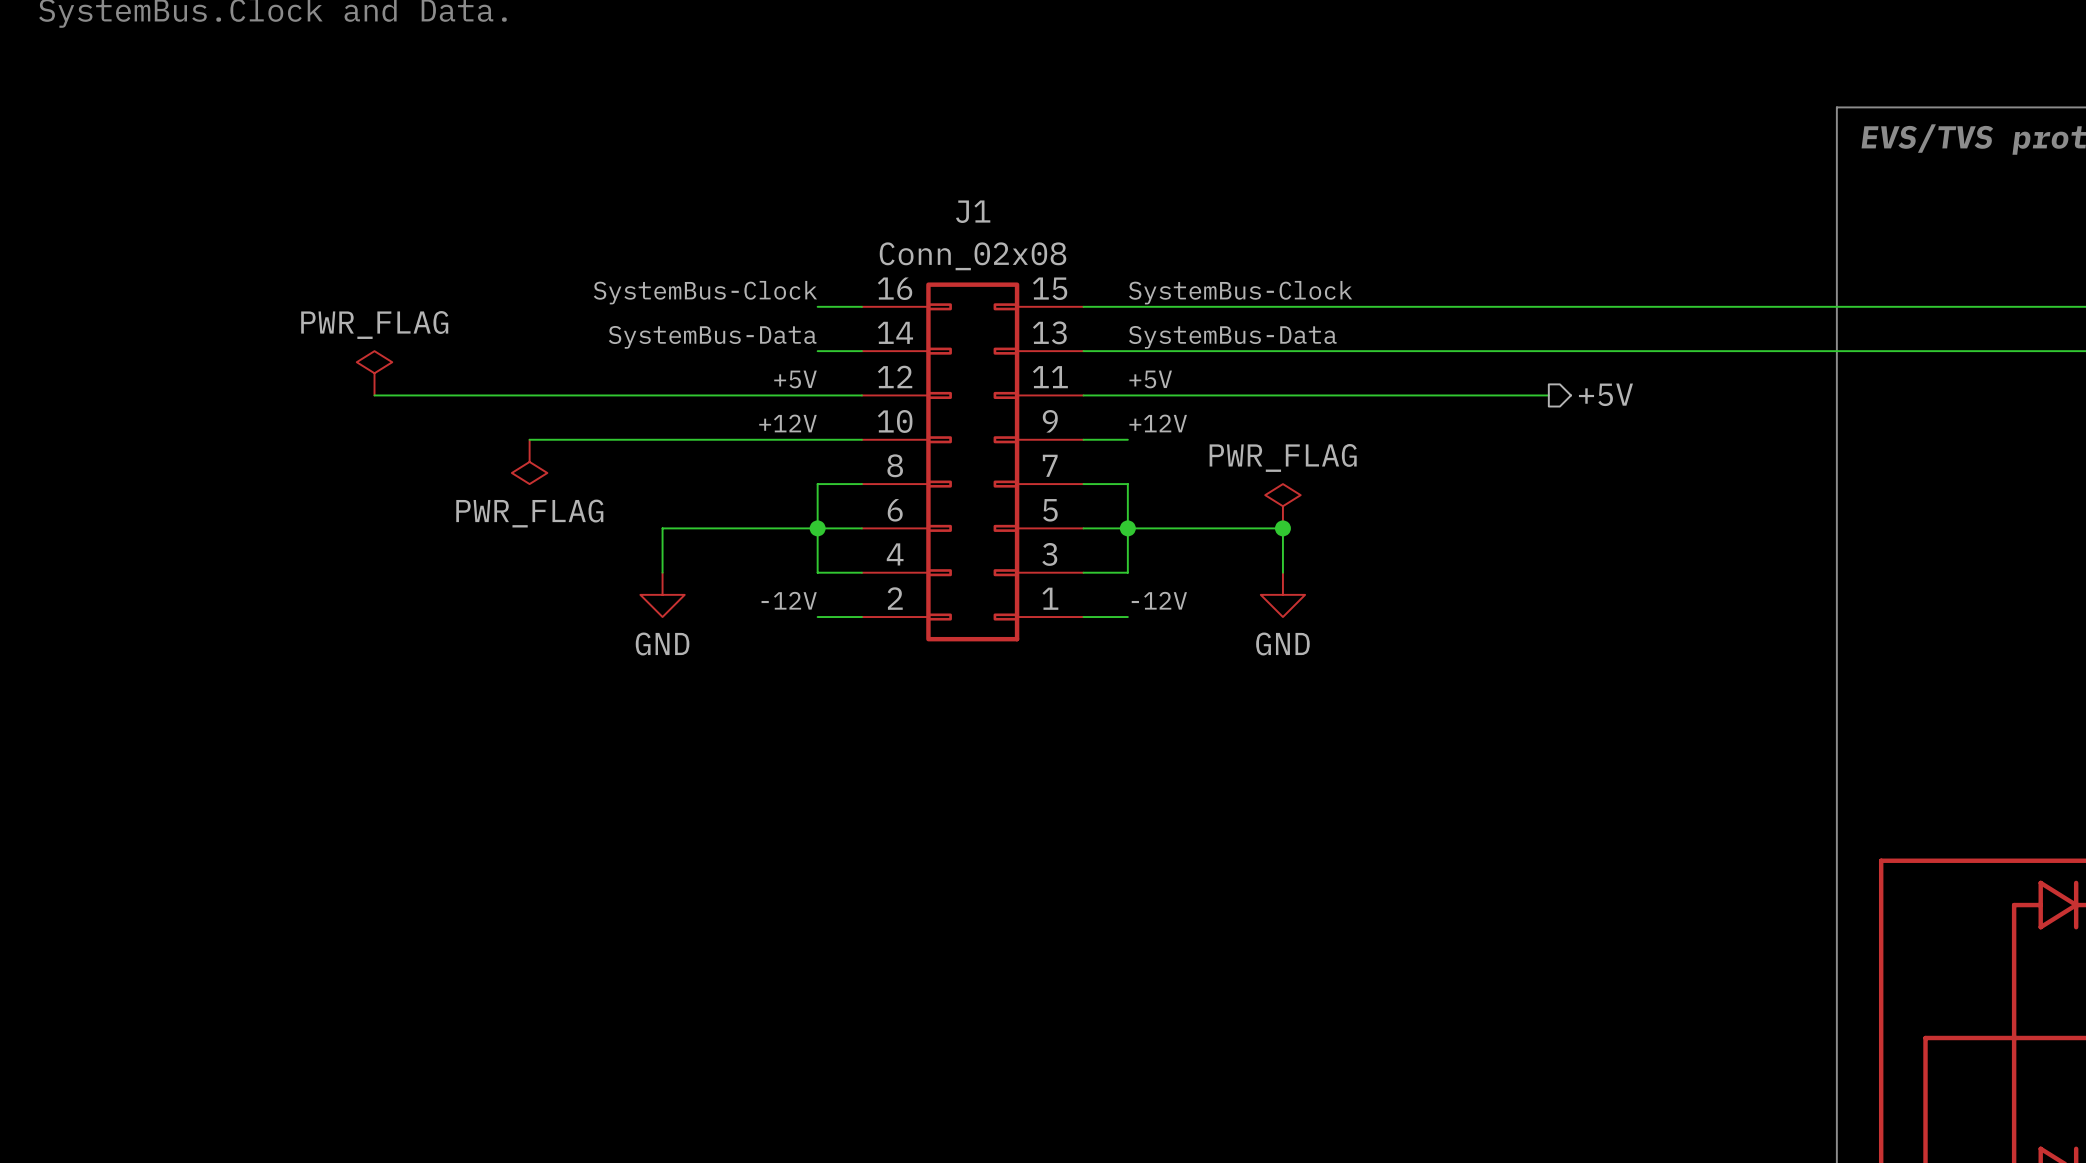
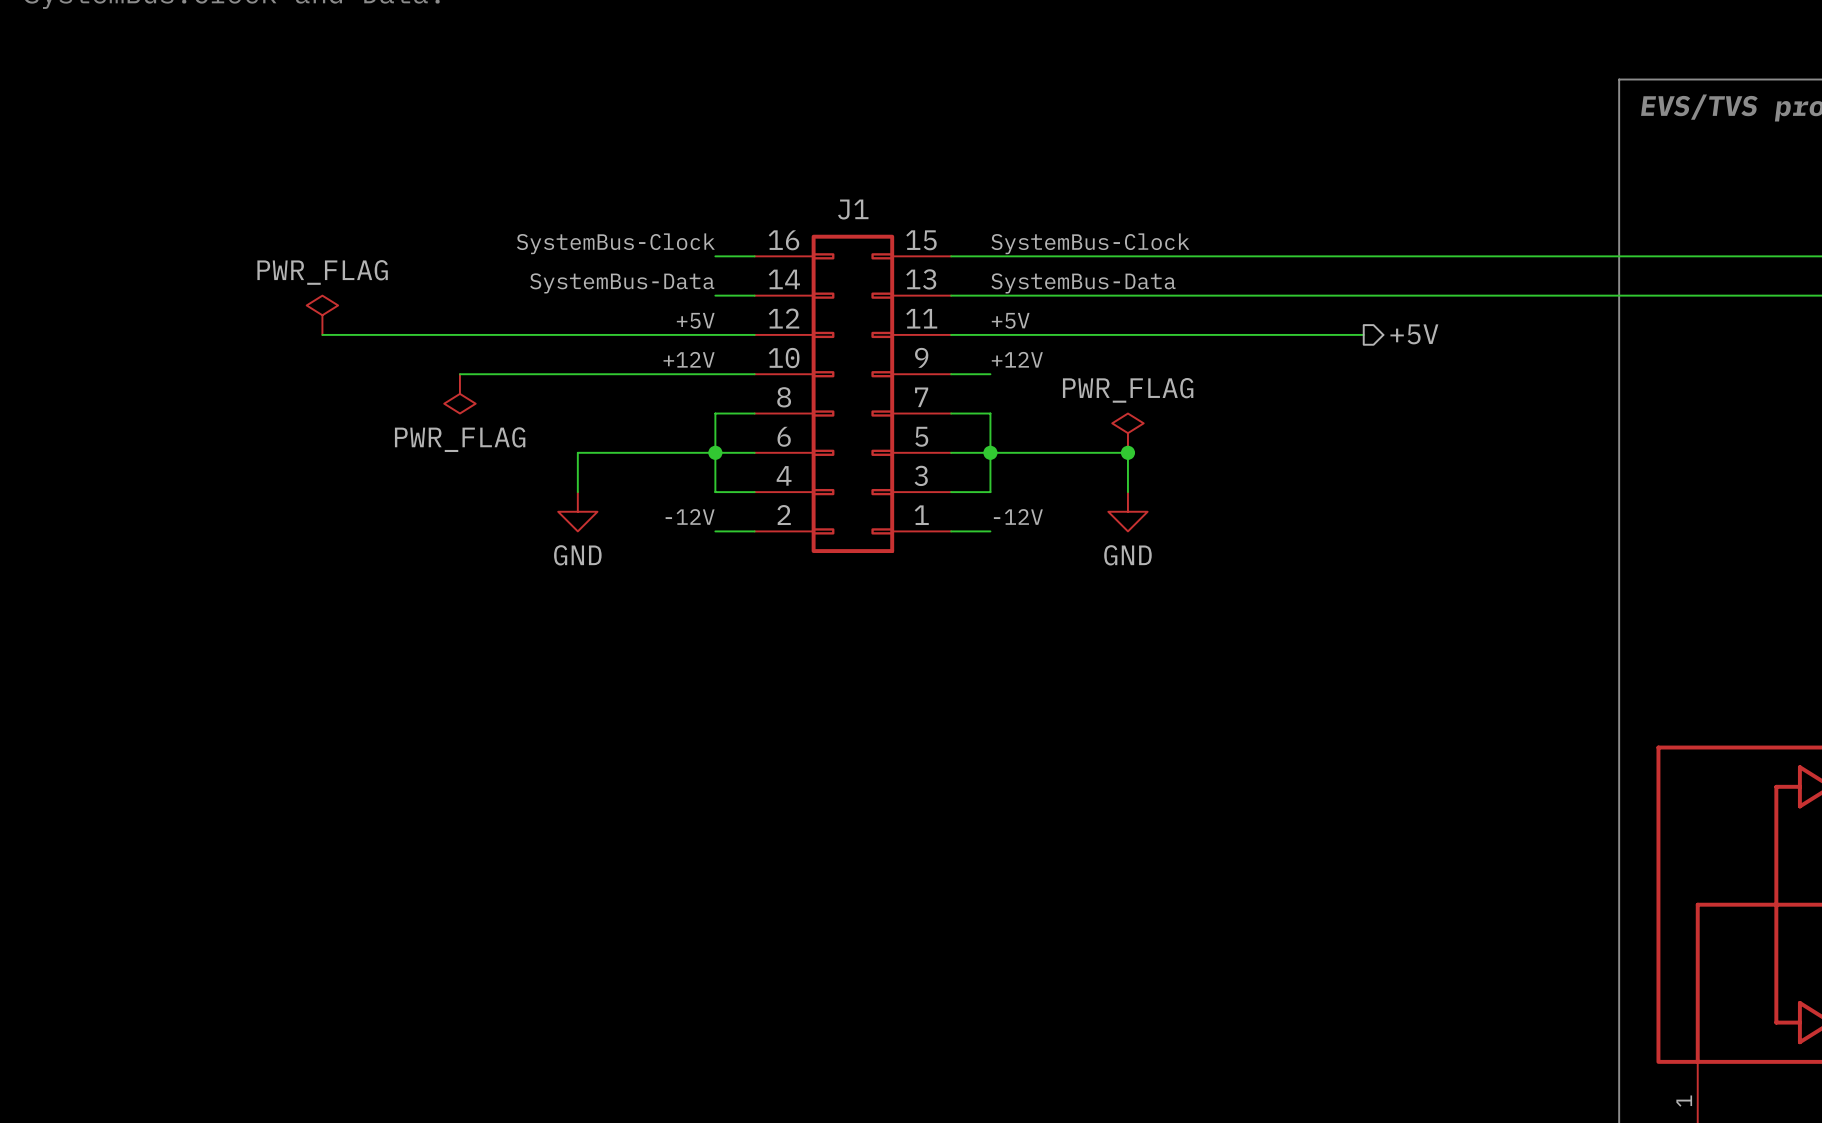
J1 name position: J1 (973, 211) -> J1 (853, 209)
J1 value: Conn_02x08 (972, 256) -> none

